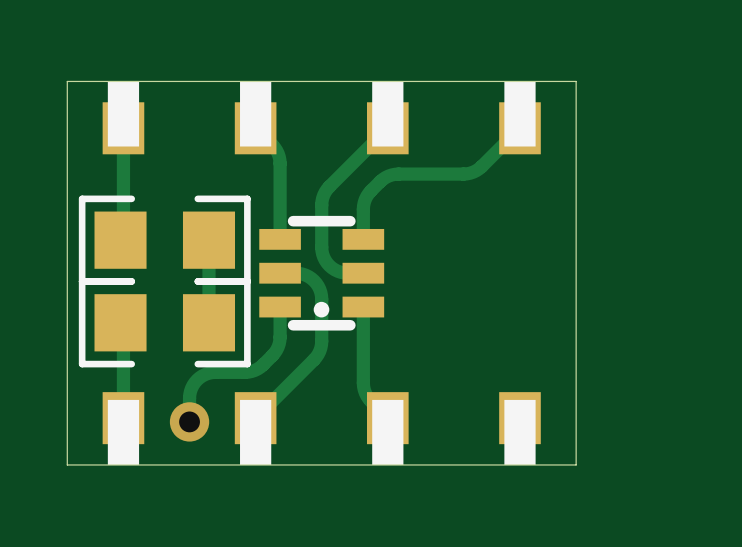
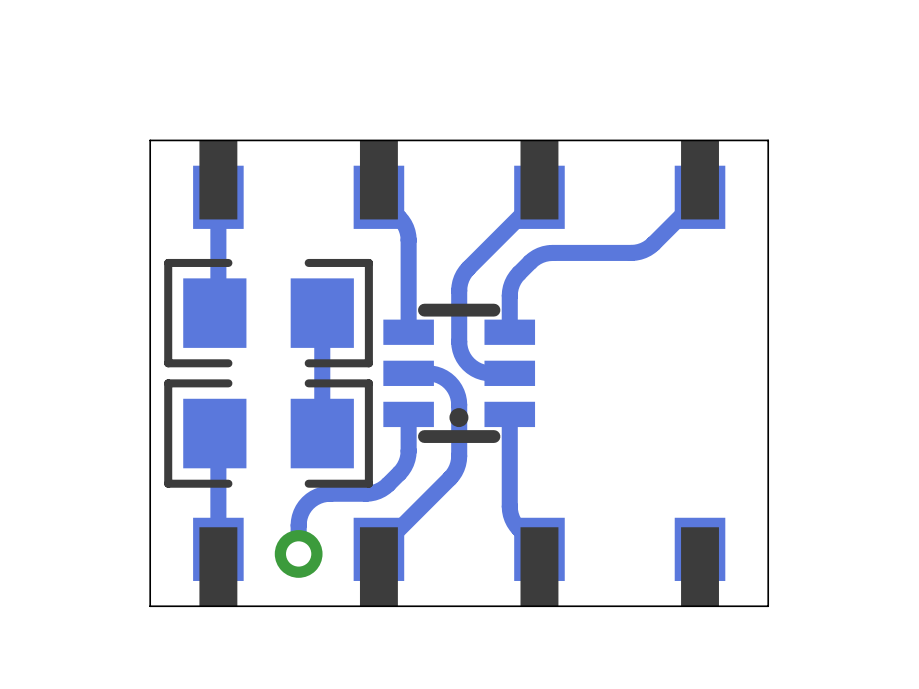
part position: (164, 240) -> (268, 313)

